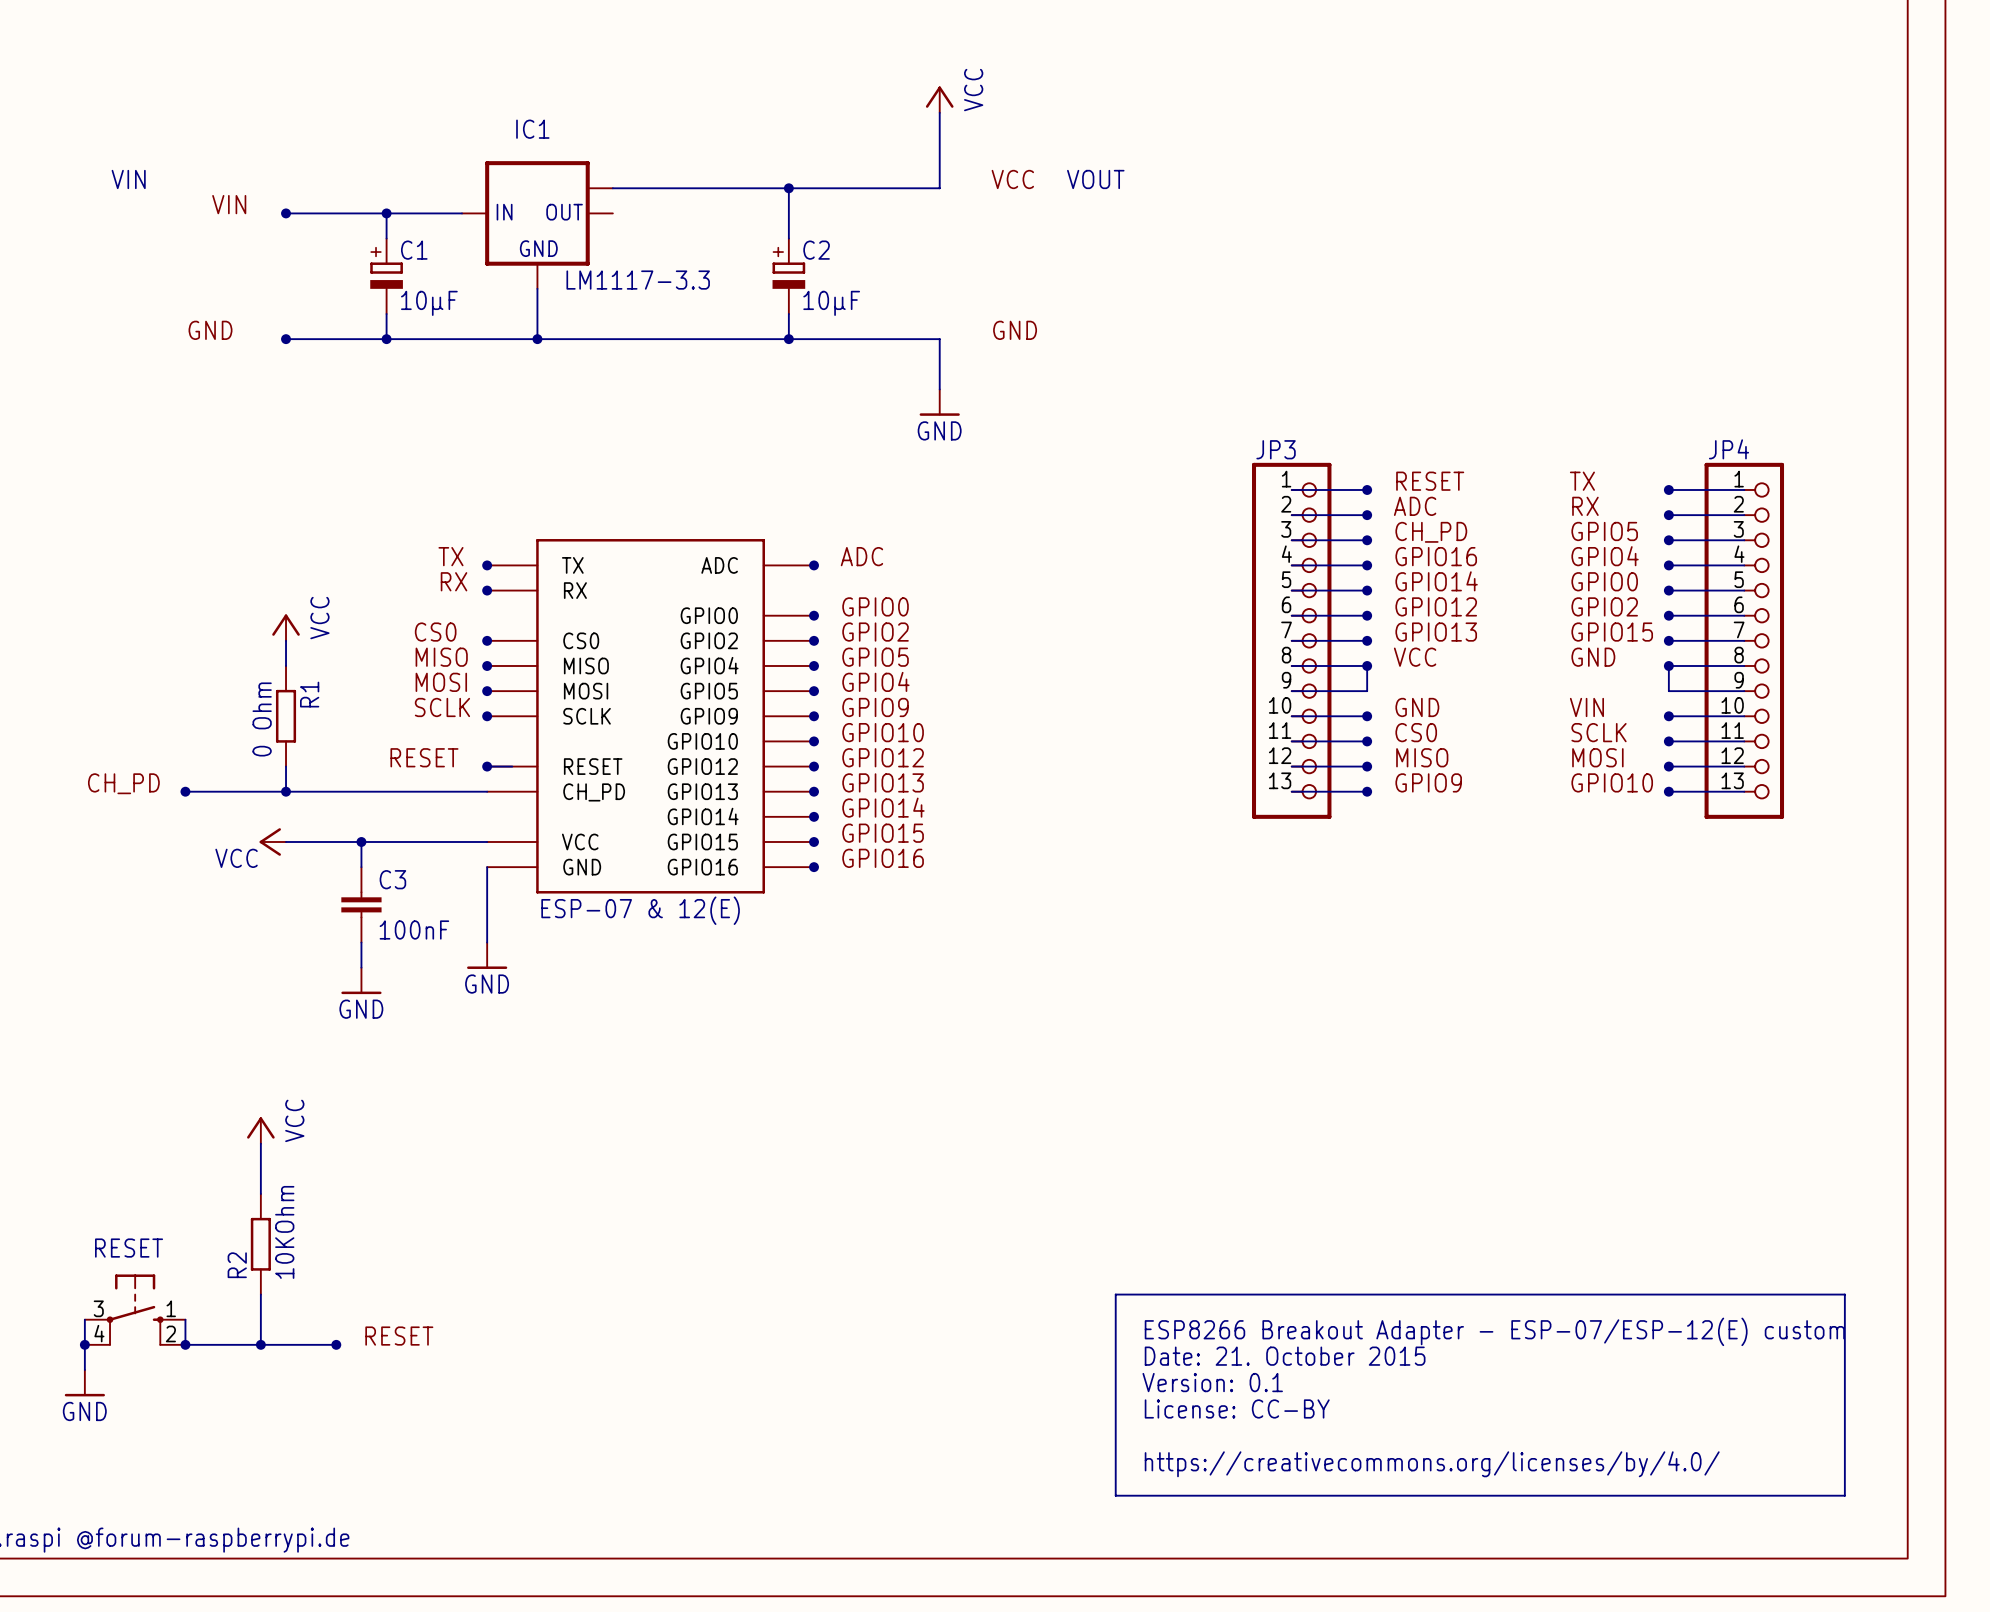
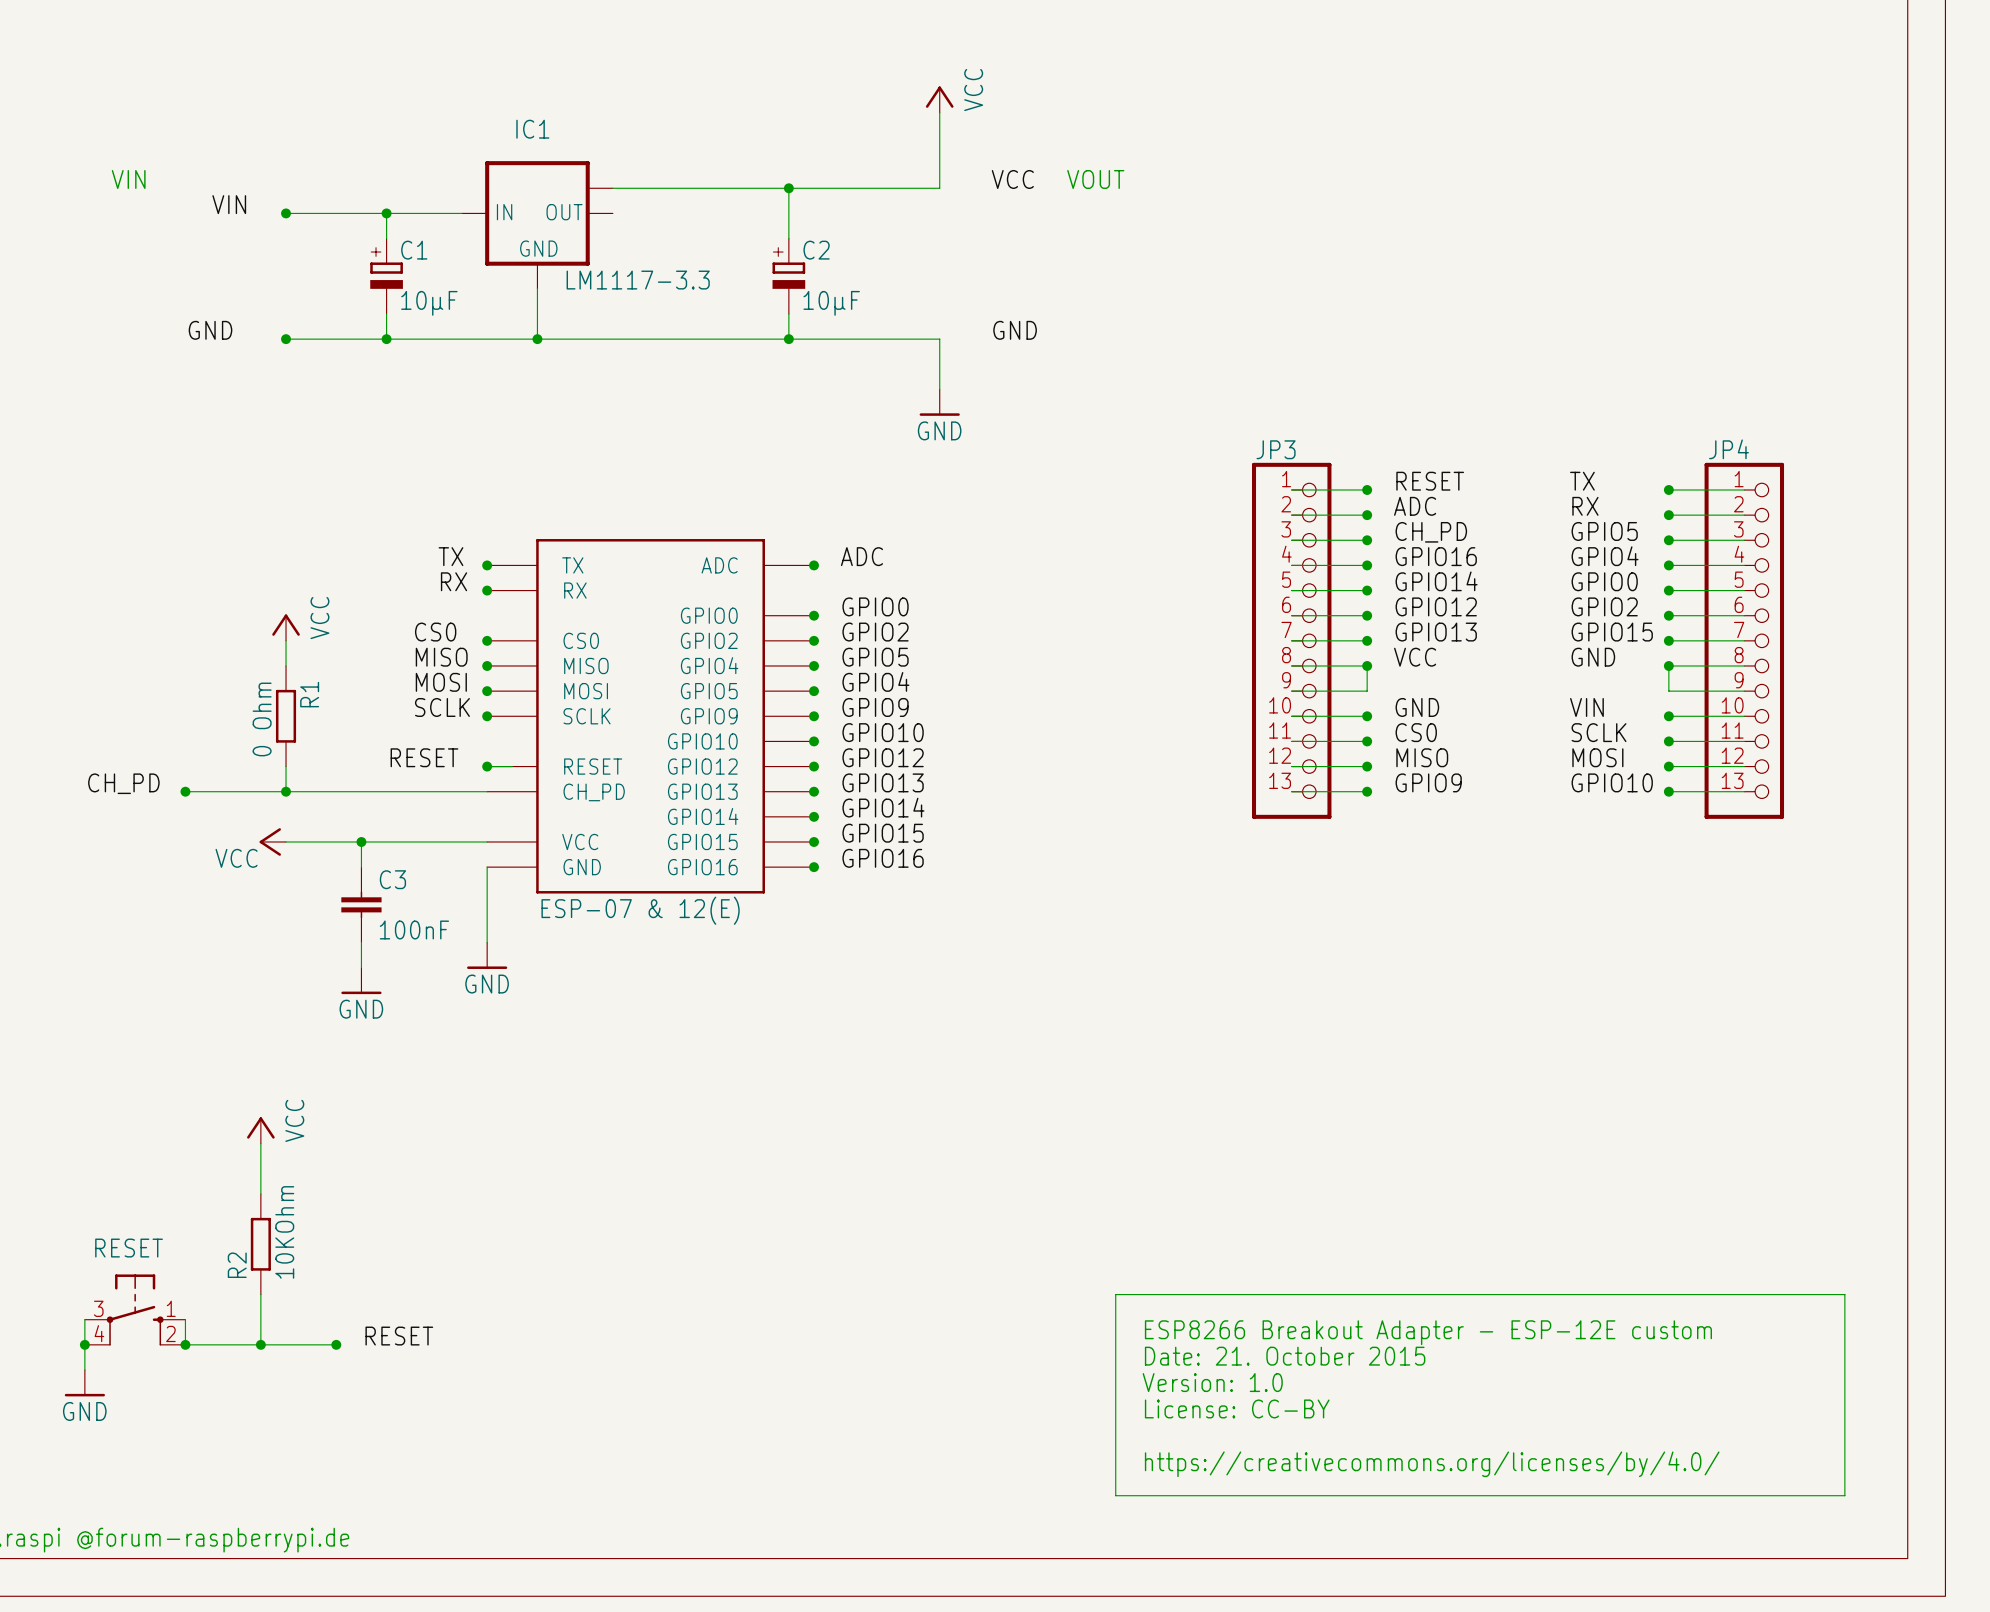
text: ESP8266 Breakout Adapter - ESP-07/ESP-12(E) custom (1494, 1331) -> ESP8266 Breakout Adapter - ESP-12E custom (1428, 1332)
text: Version: 0.1 (1212, 1382) -> Version: 1.0 (1212, 1382)

